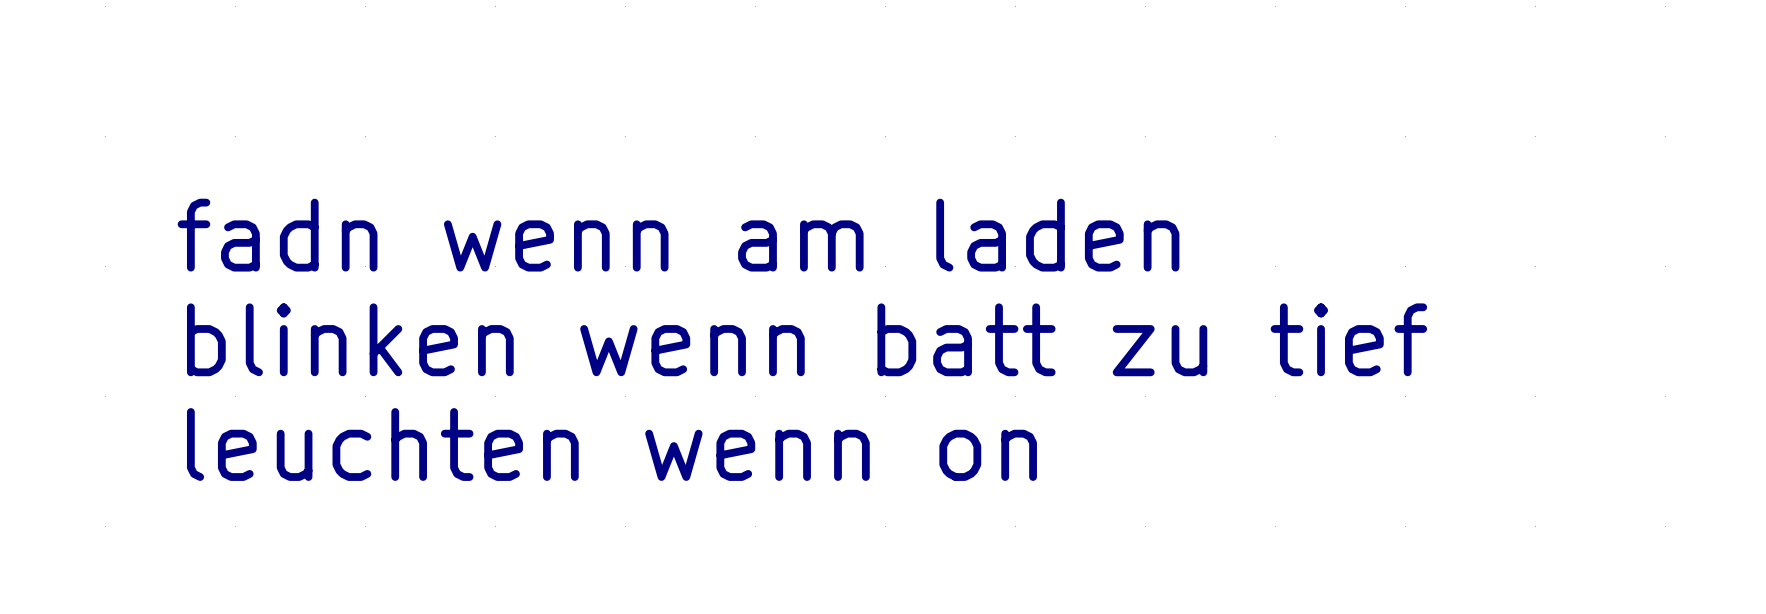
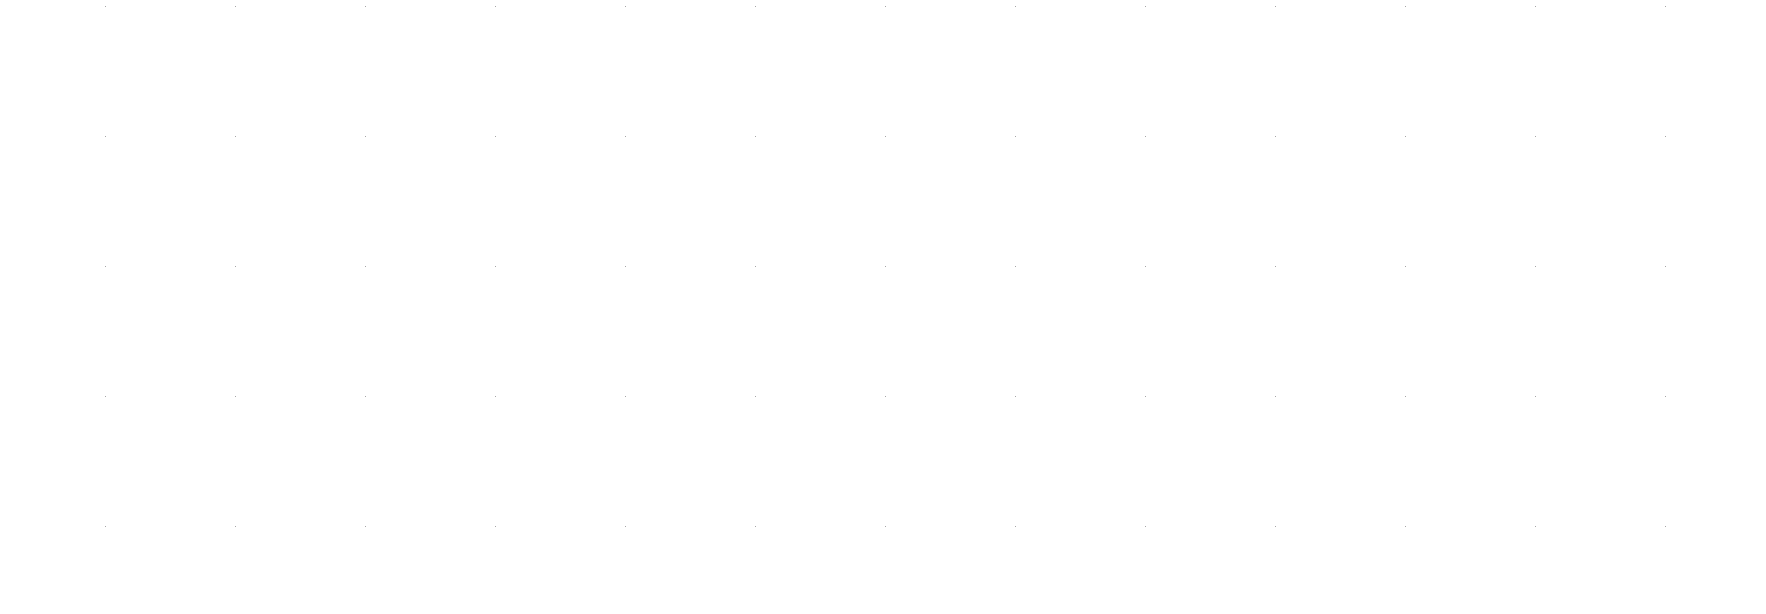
text: fadn wenn am laden (678, 235) -> none
text: blinken wenn batt zu tief (807, 339) -> none
text: leuchten wenn on (611, 444) -> none

